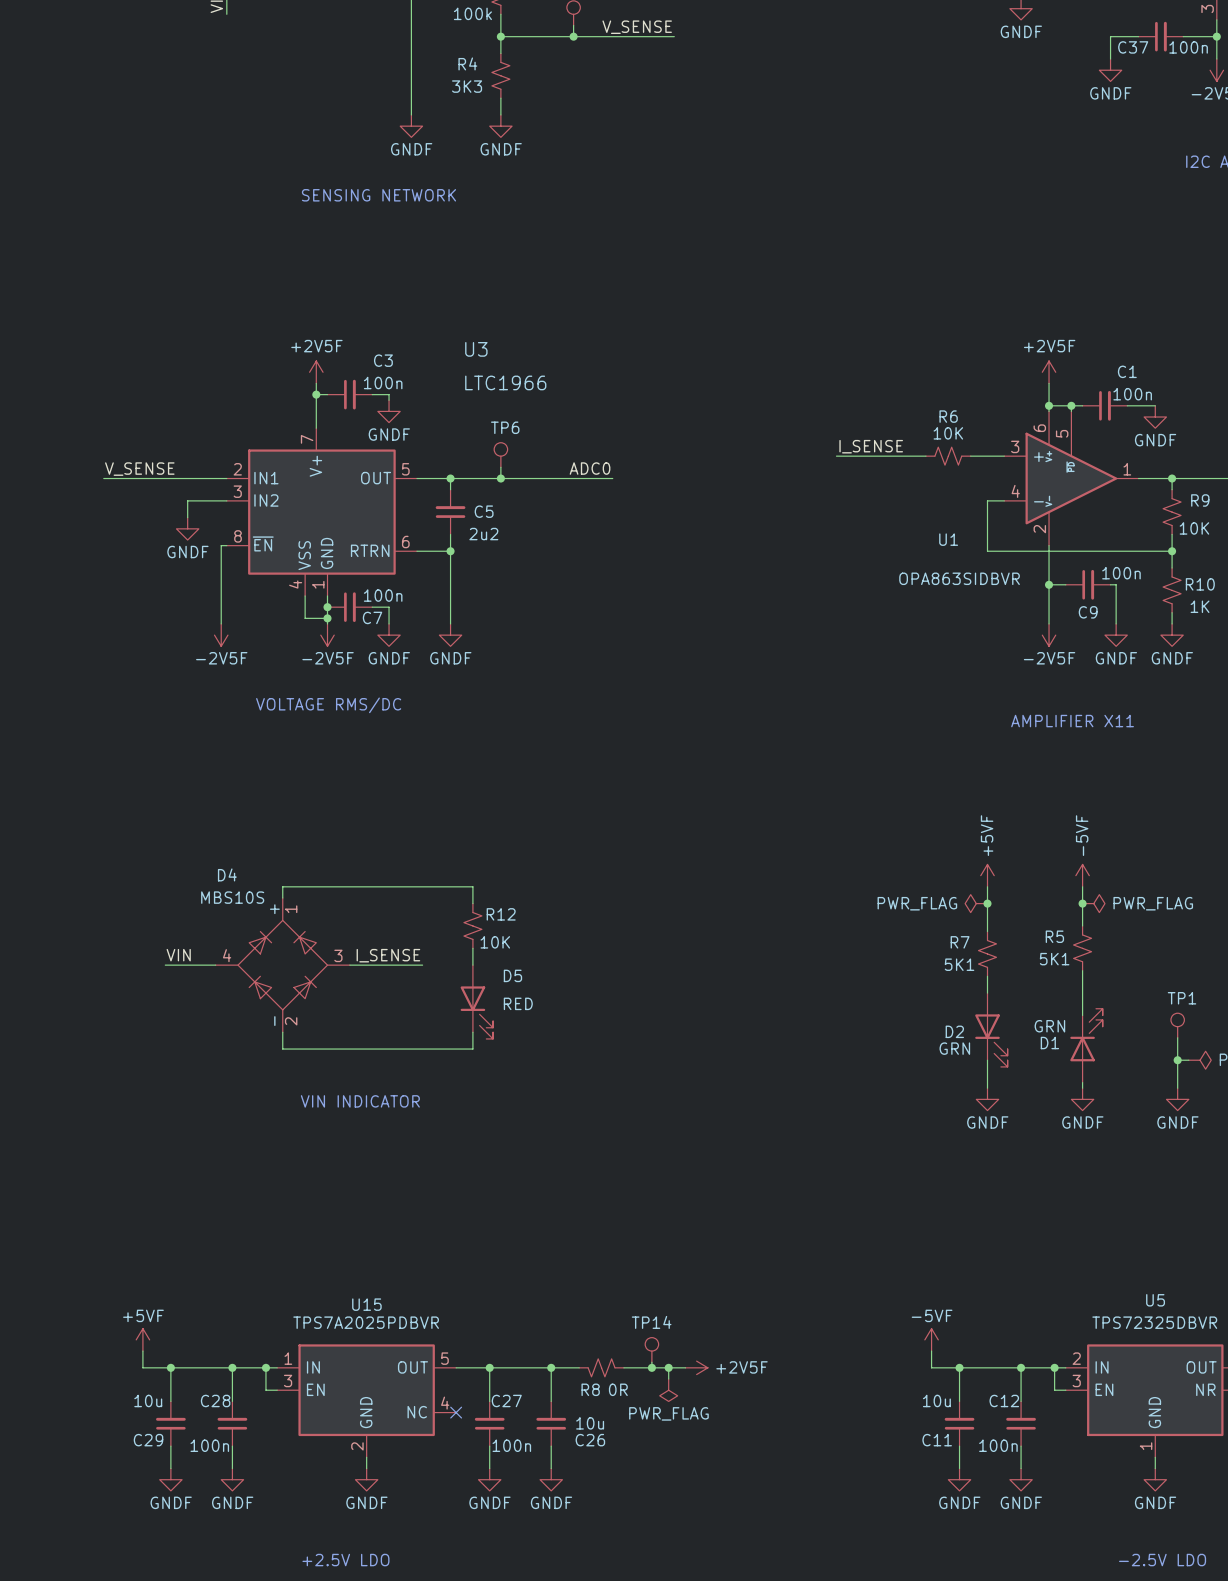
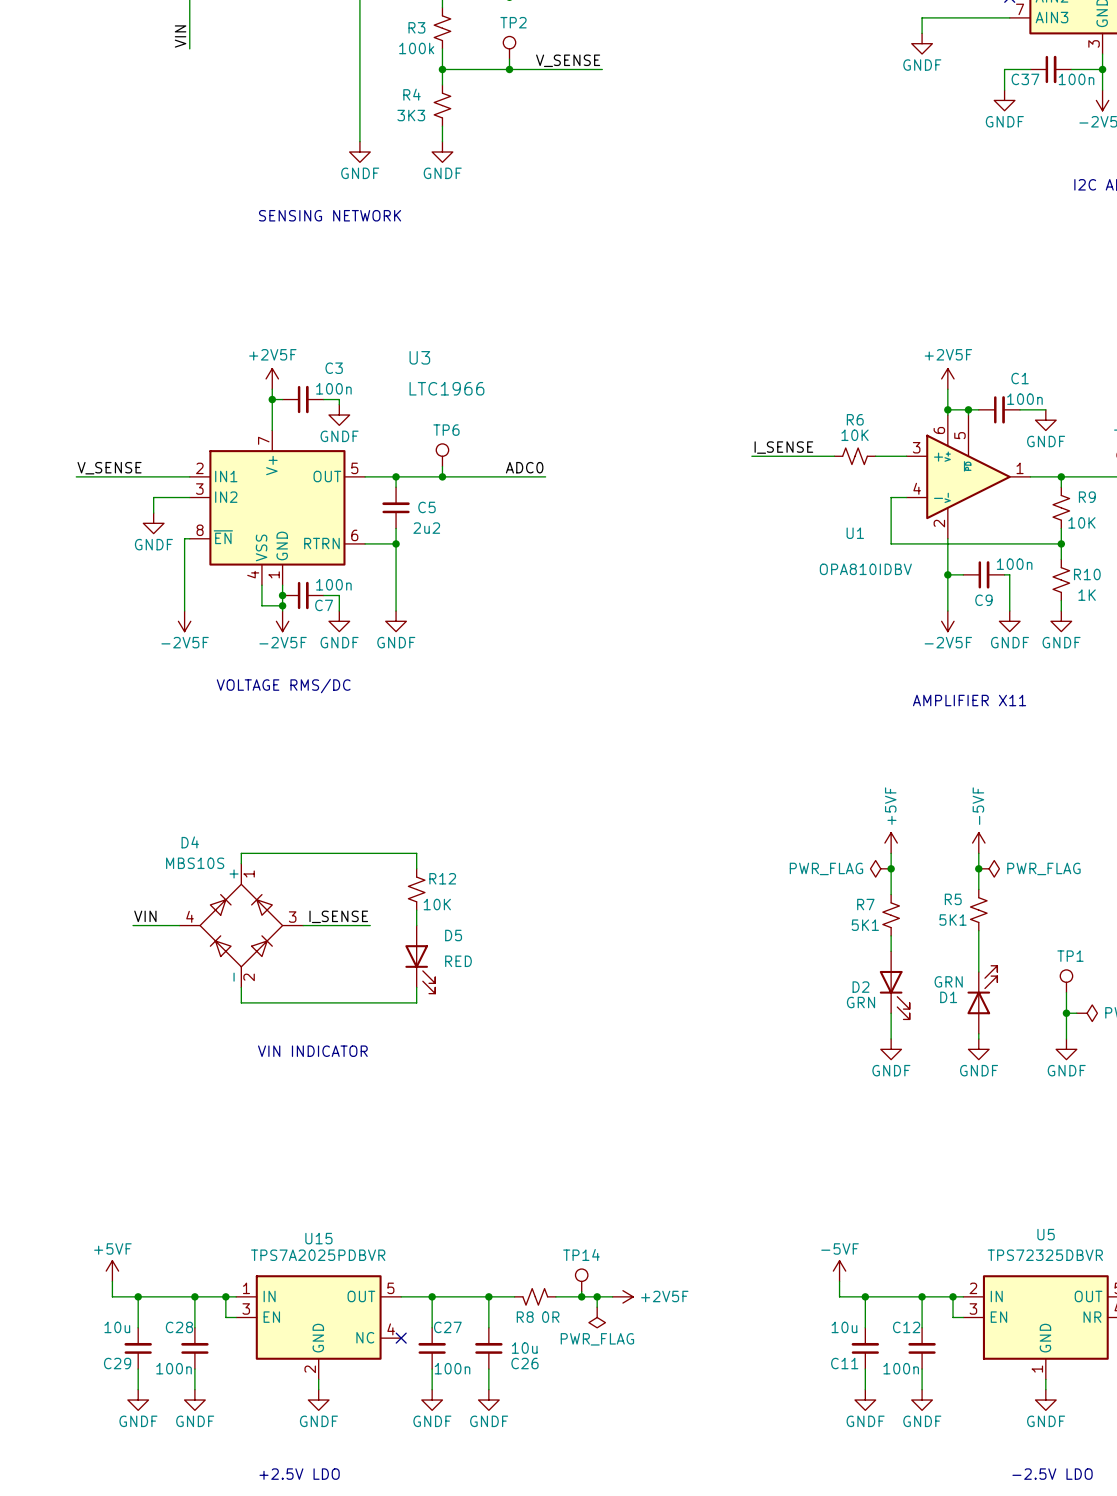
U1 value: OPA863SIDBVR (959, 578) -> OPA810IDBV (865, 569)

